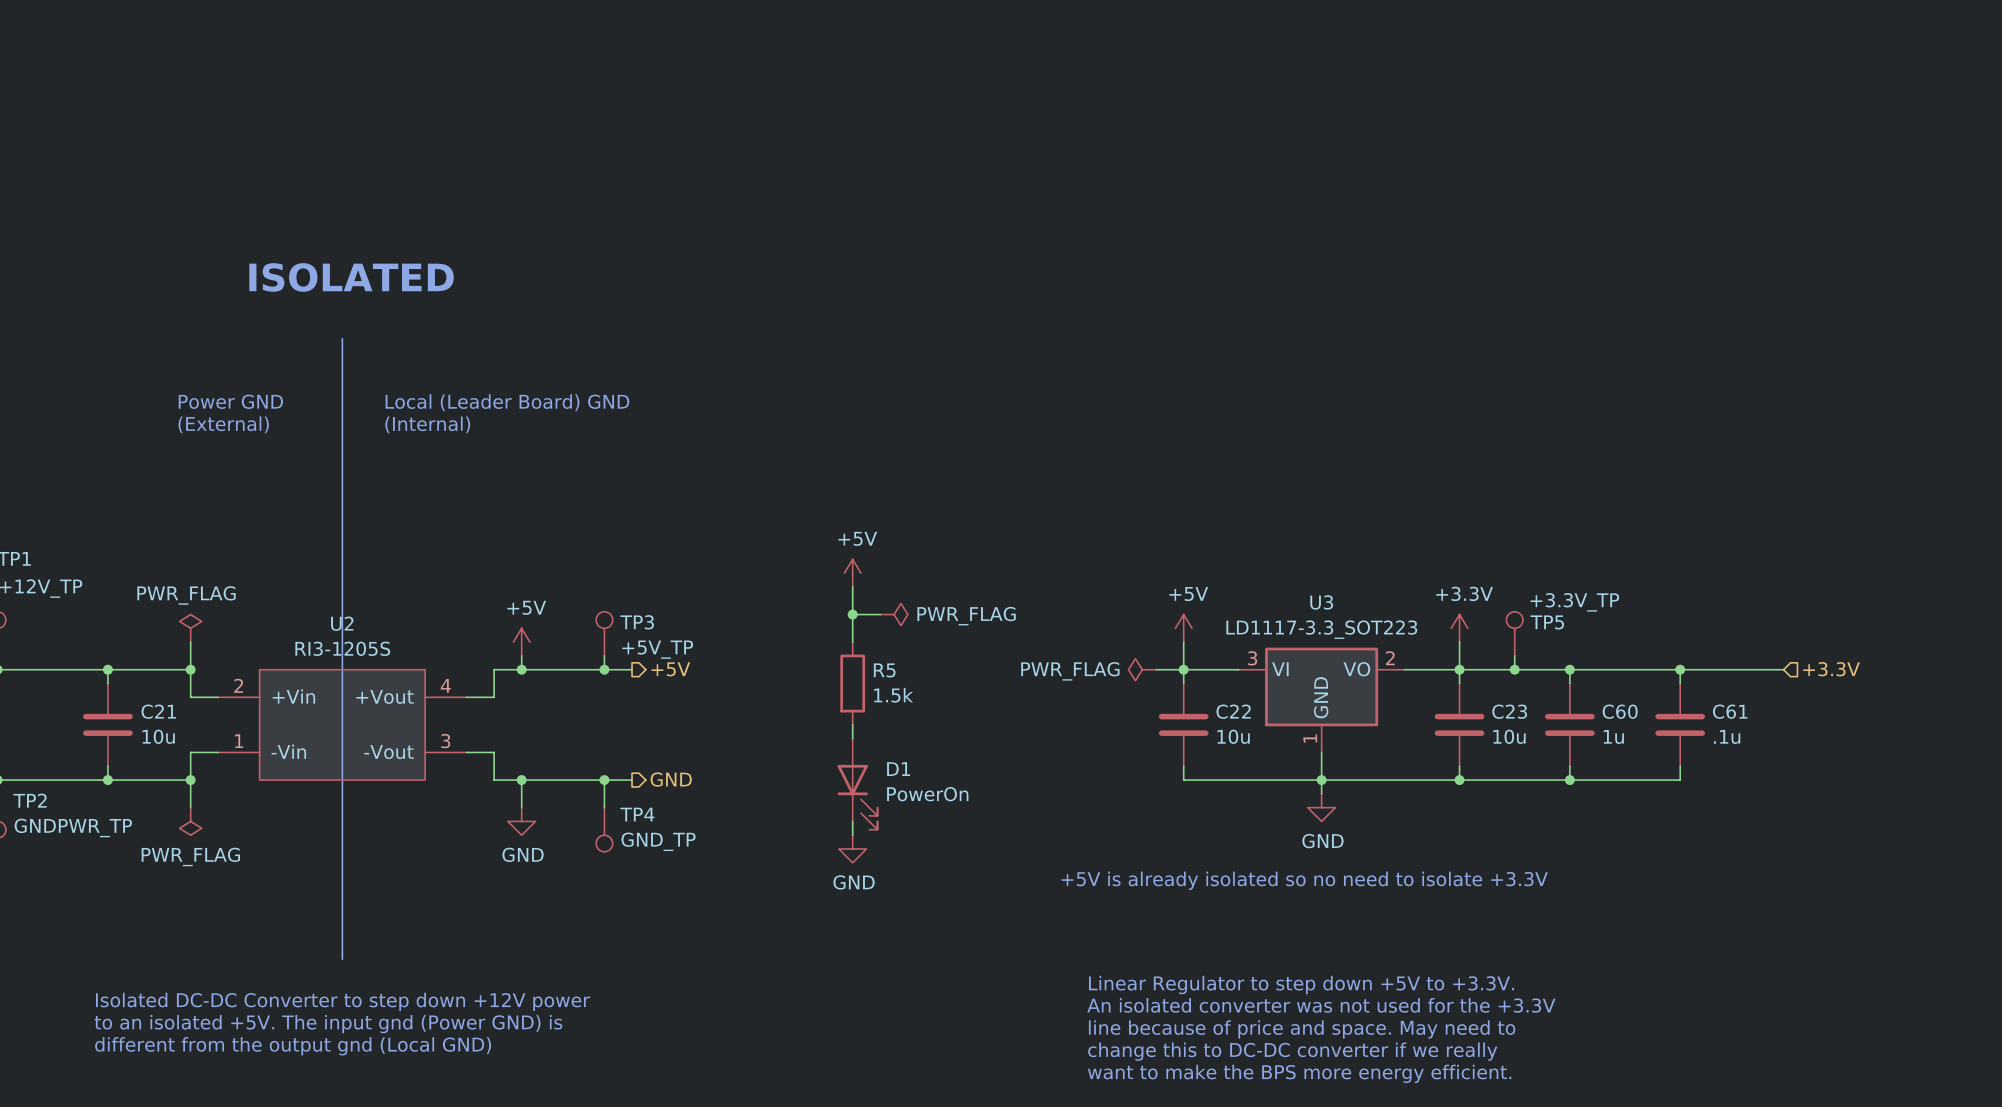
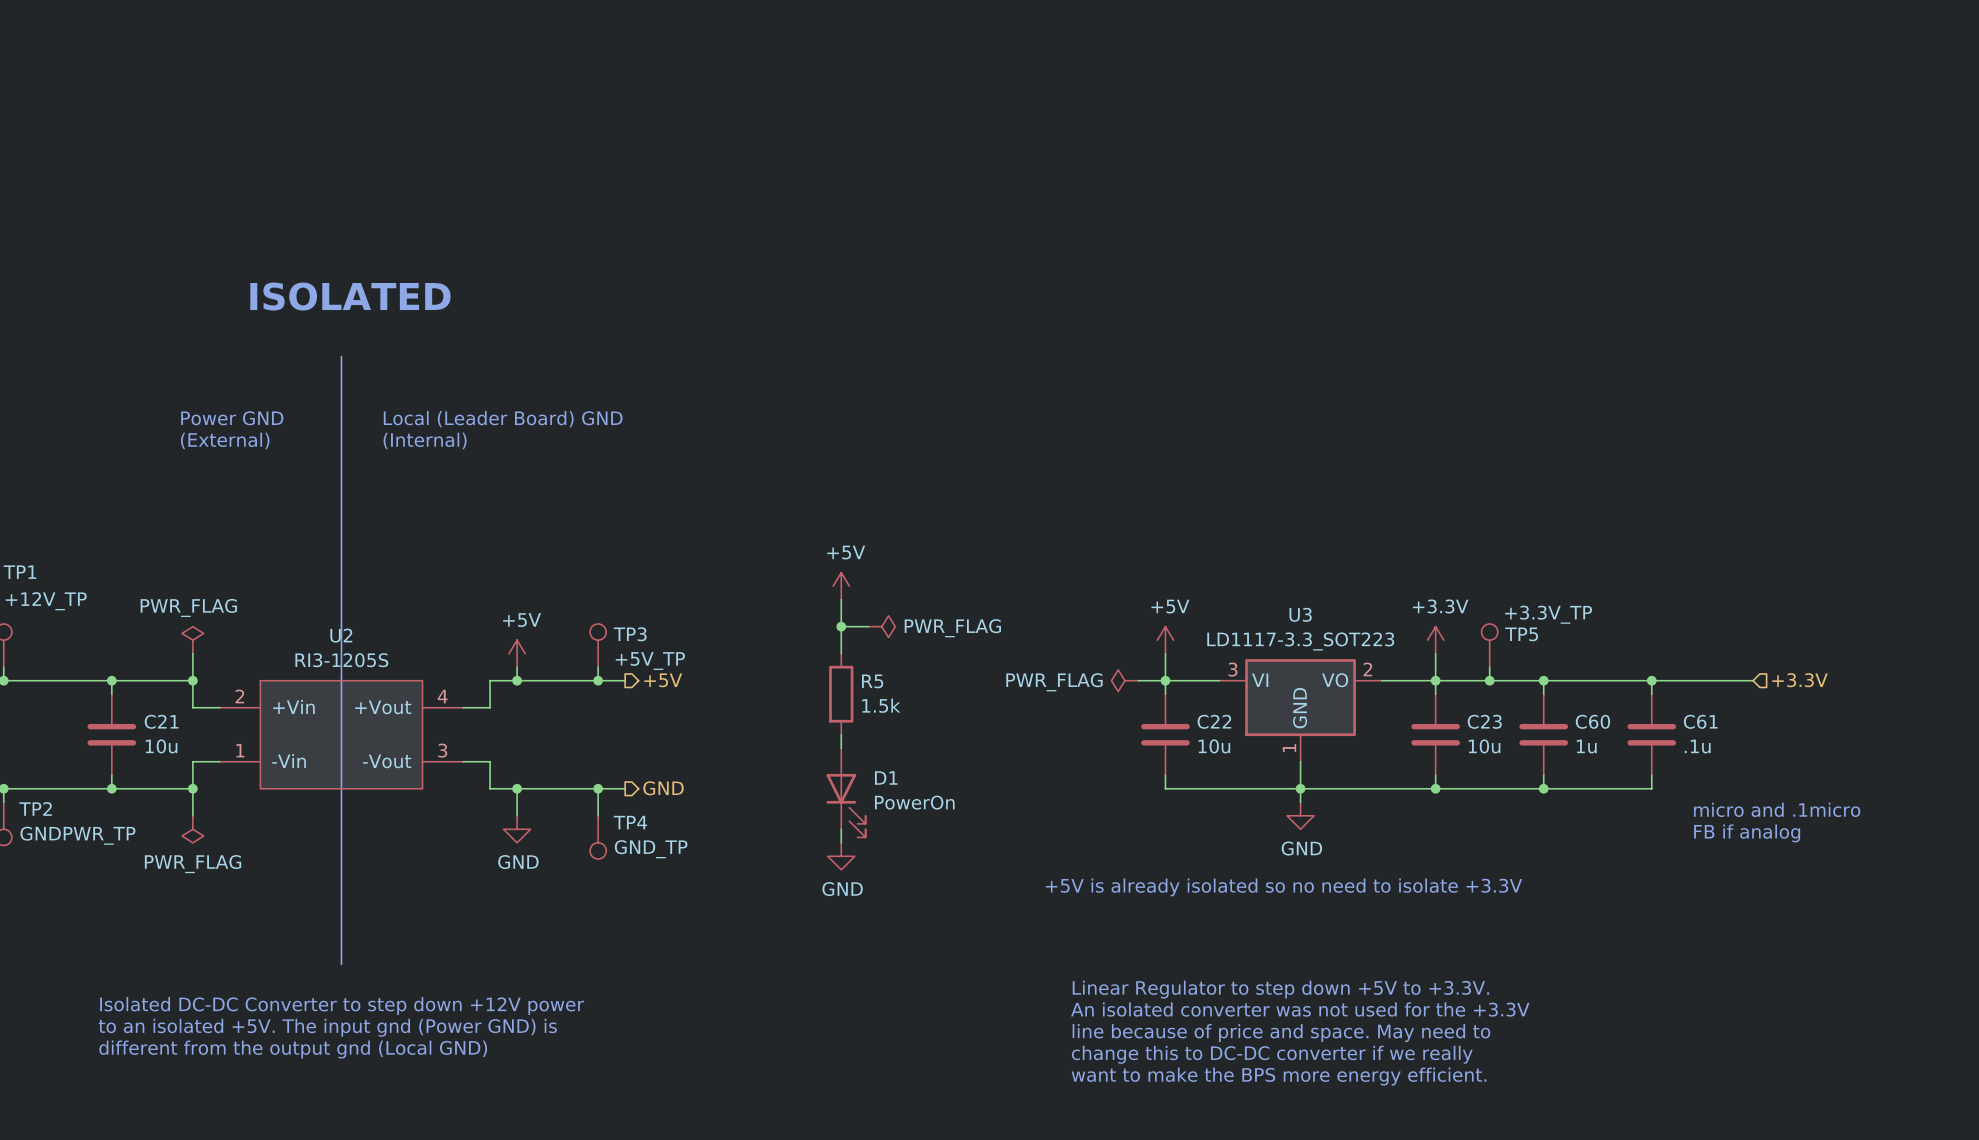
text: none -> micro and .1micro (1777, 809)
text: none -> FB if analog (1747, 833)

